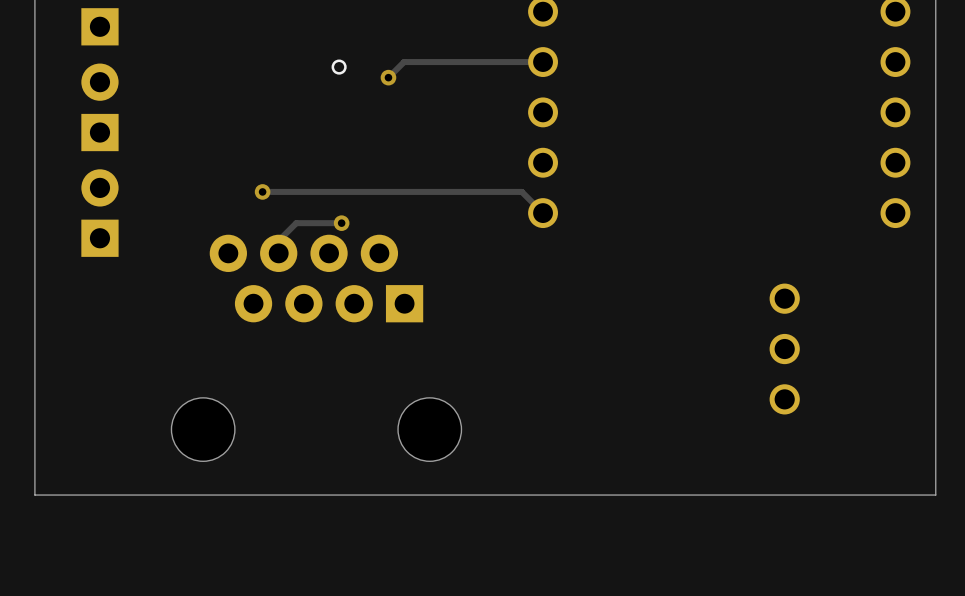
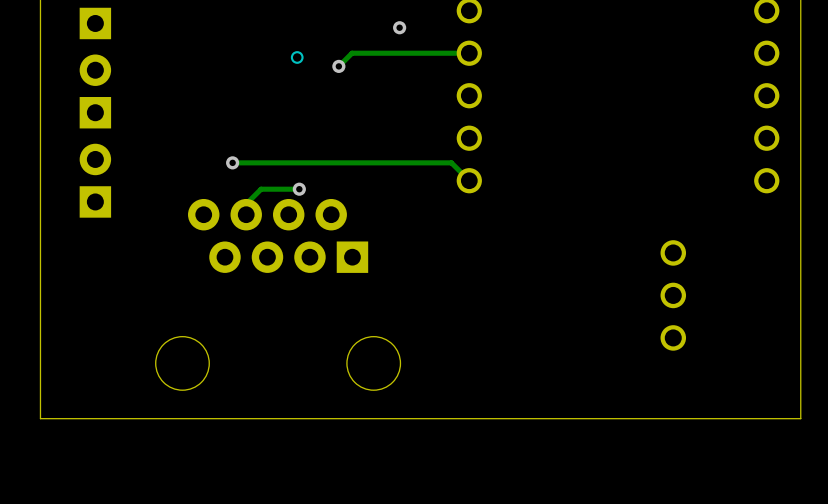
via: none -> (399, 27)

